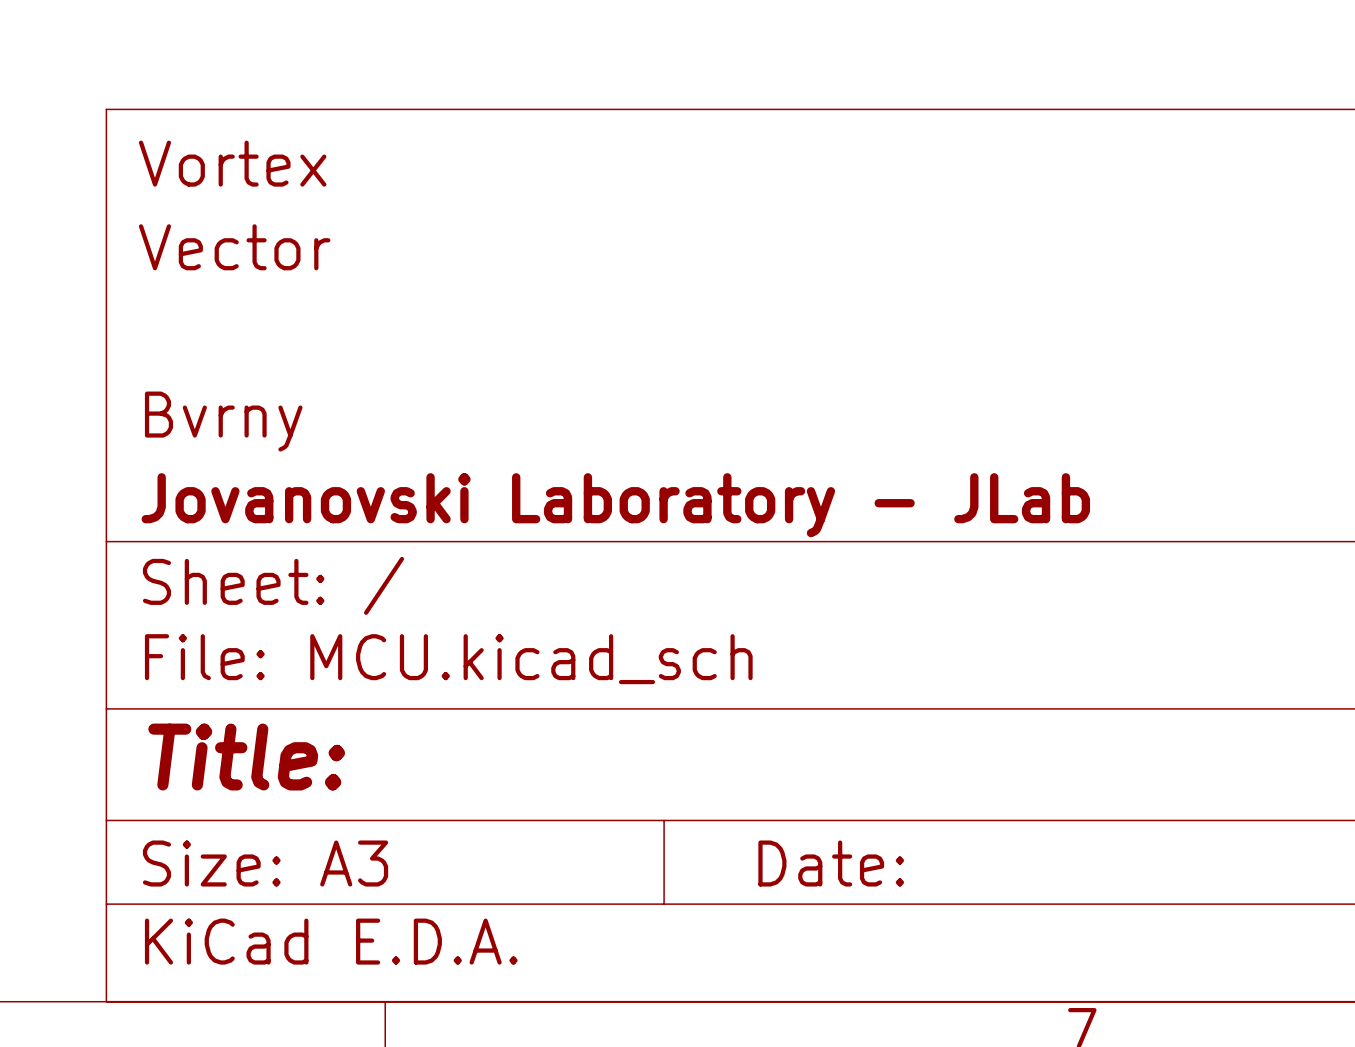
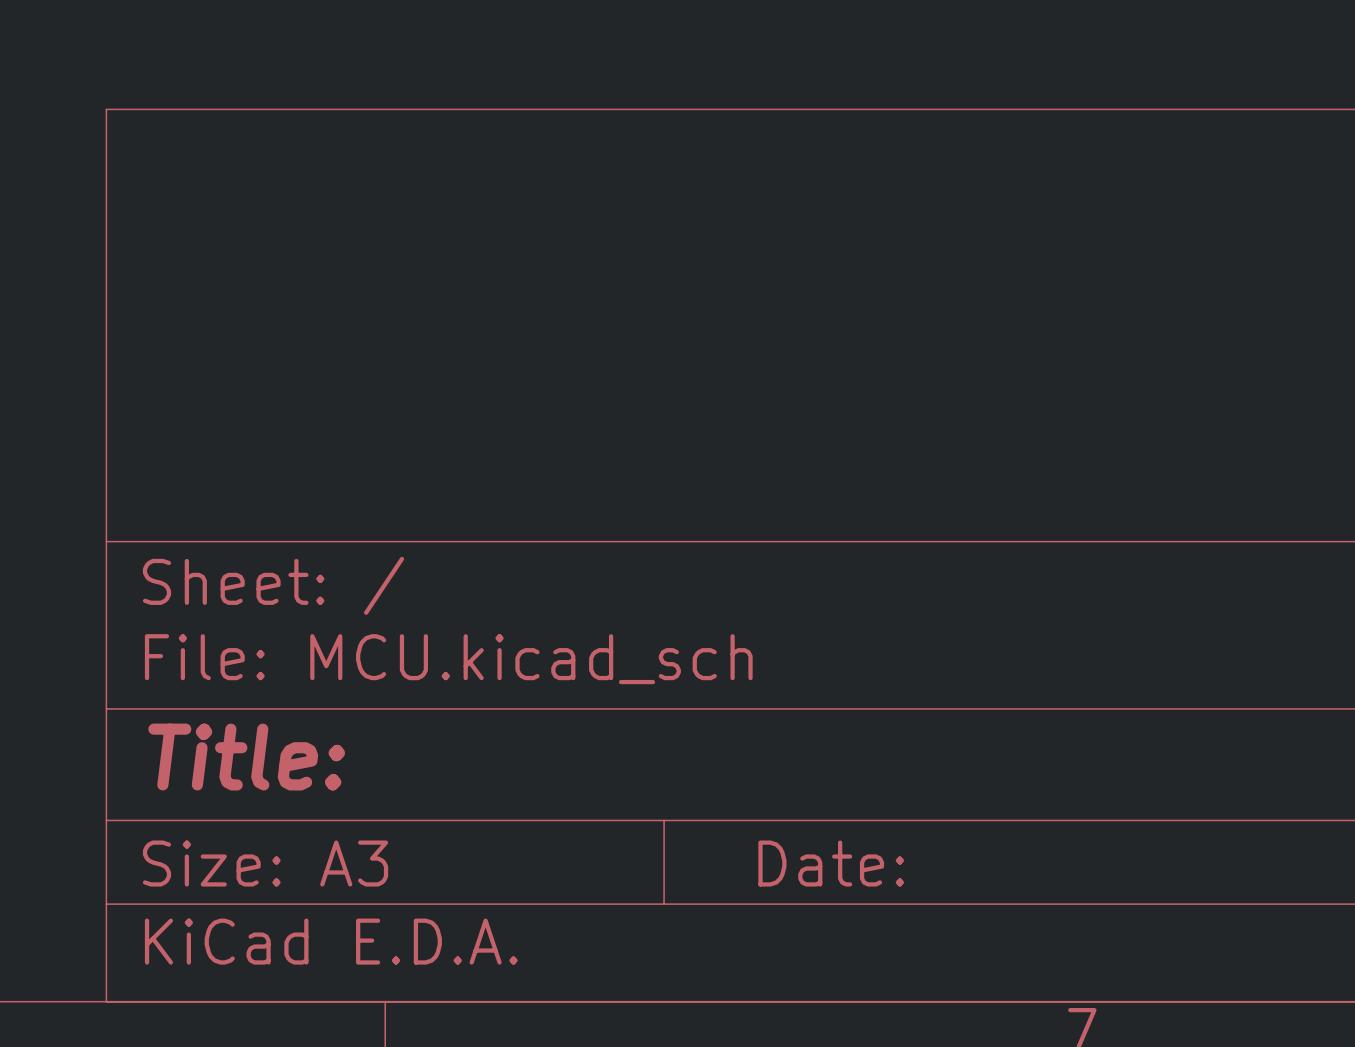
title block: Vortex (232, 163) -> none
title block: Vector (234, 247) -> none
title block: Bvrny (223, 421) -> none
title block: Jovanovski Laboratory - JLab (615, 505) -> none

